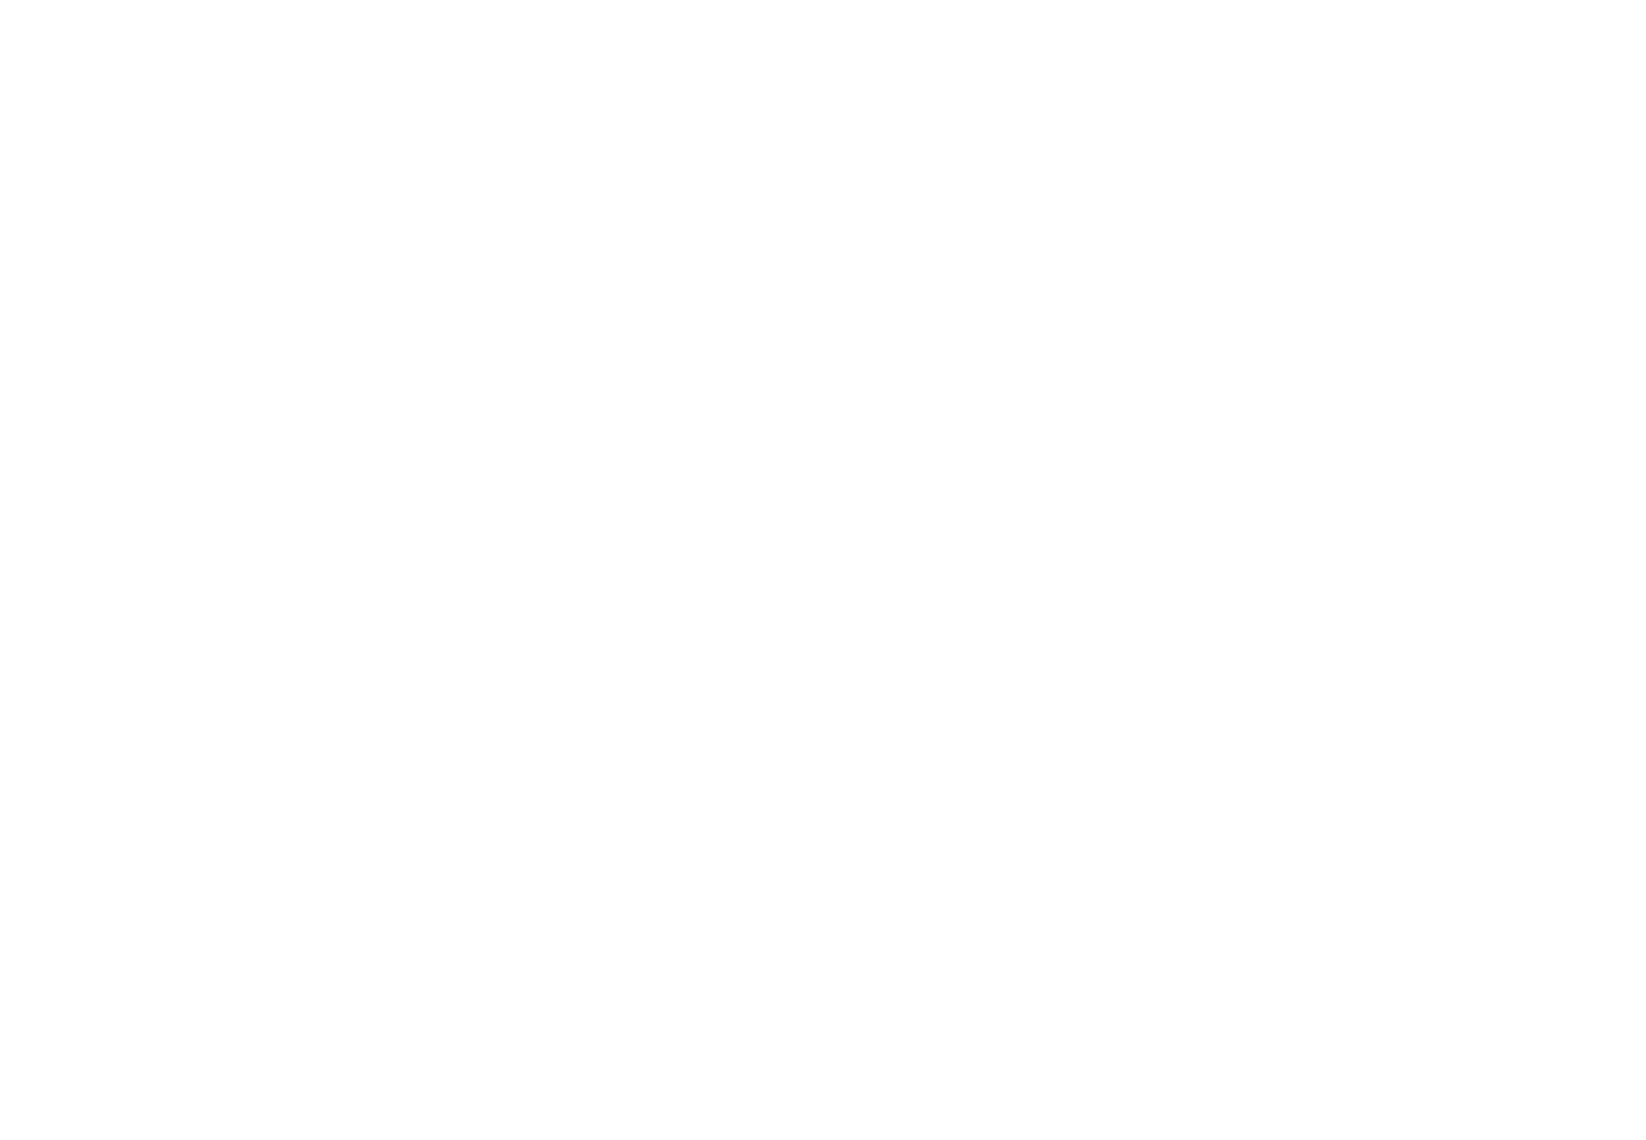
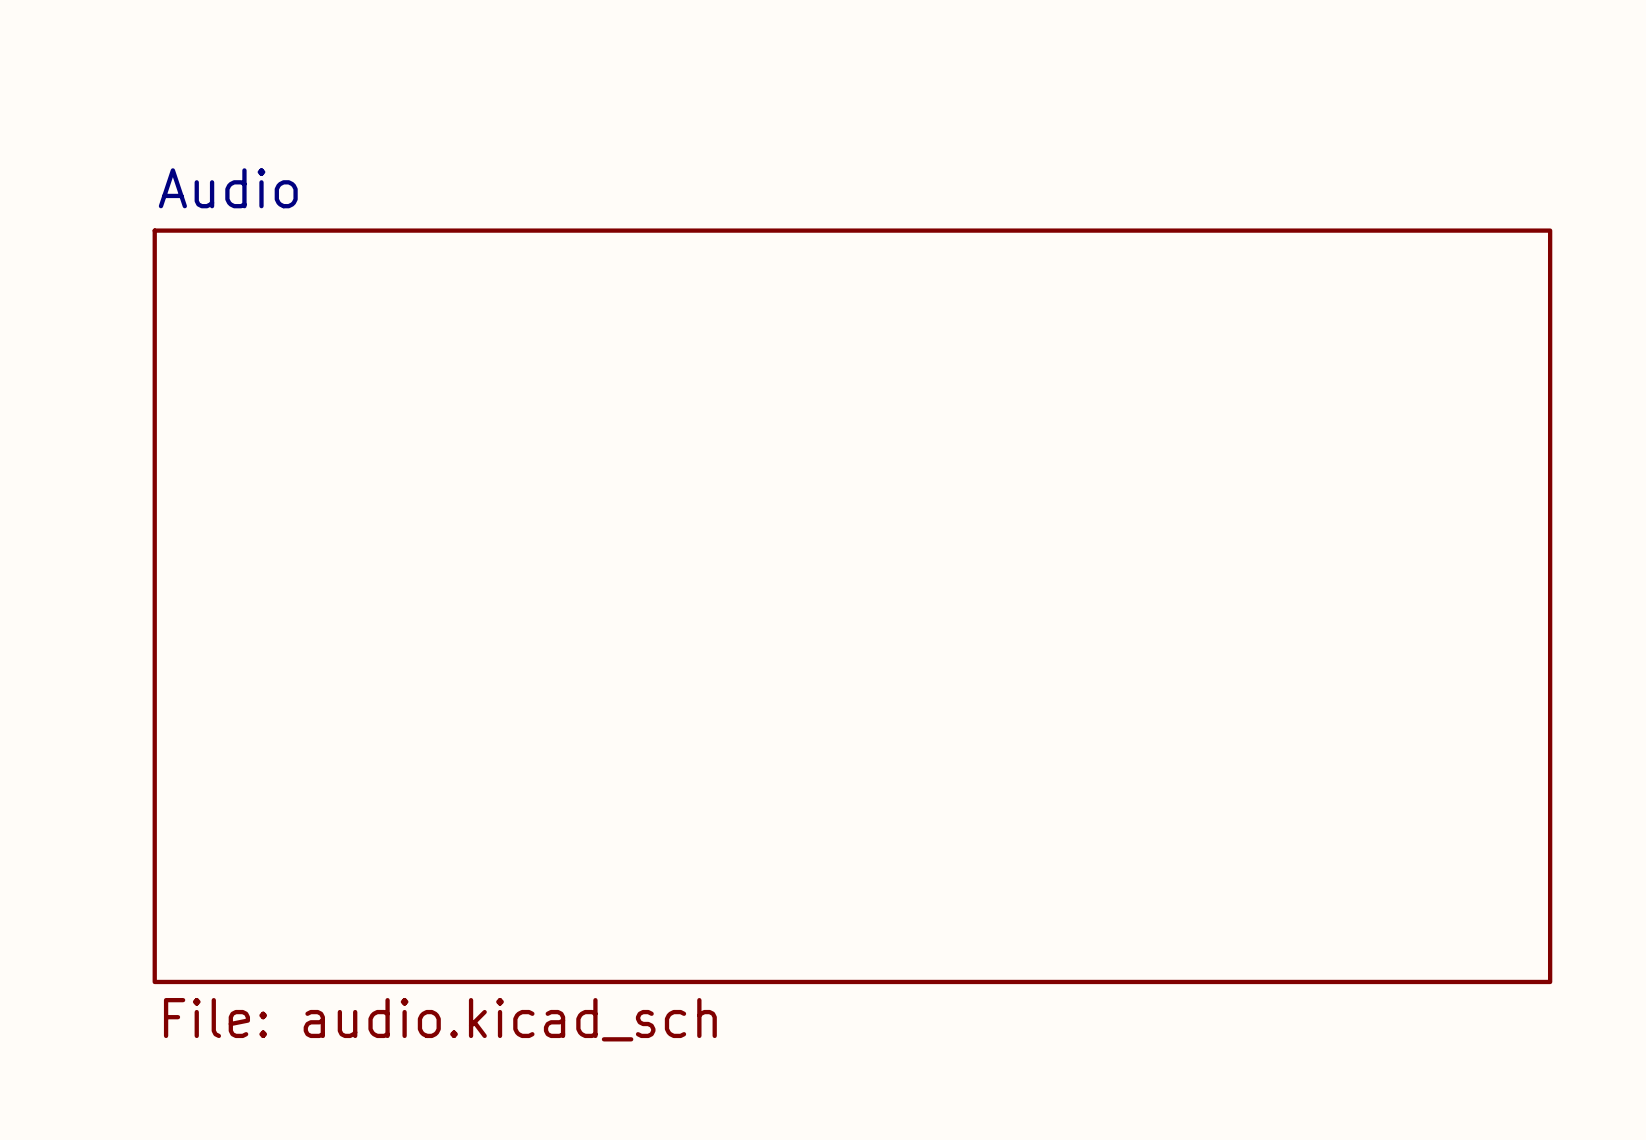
sheet Audio: none -> File: audio.kicad_sch (852, 606)

